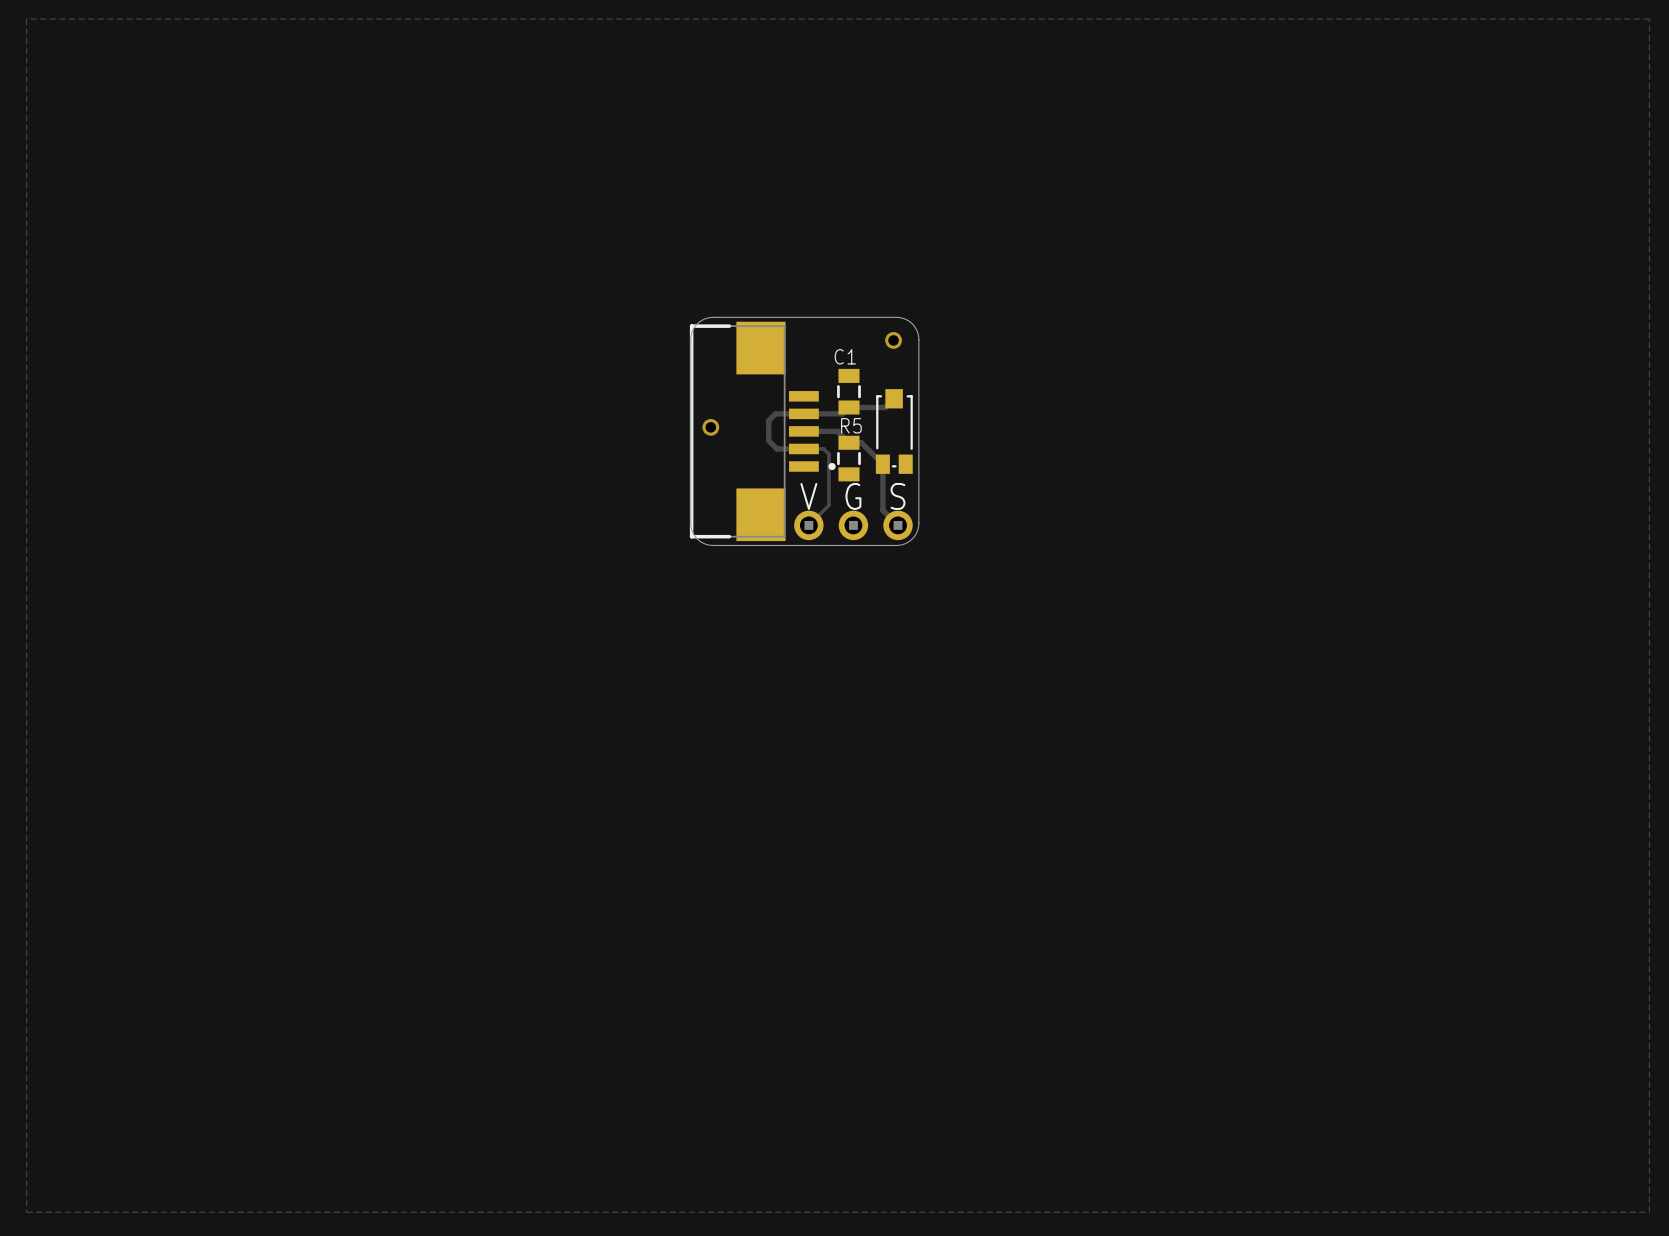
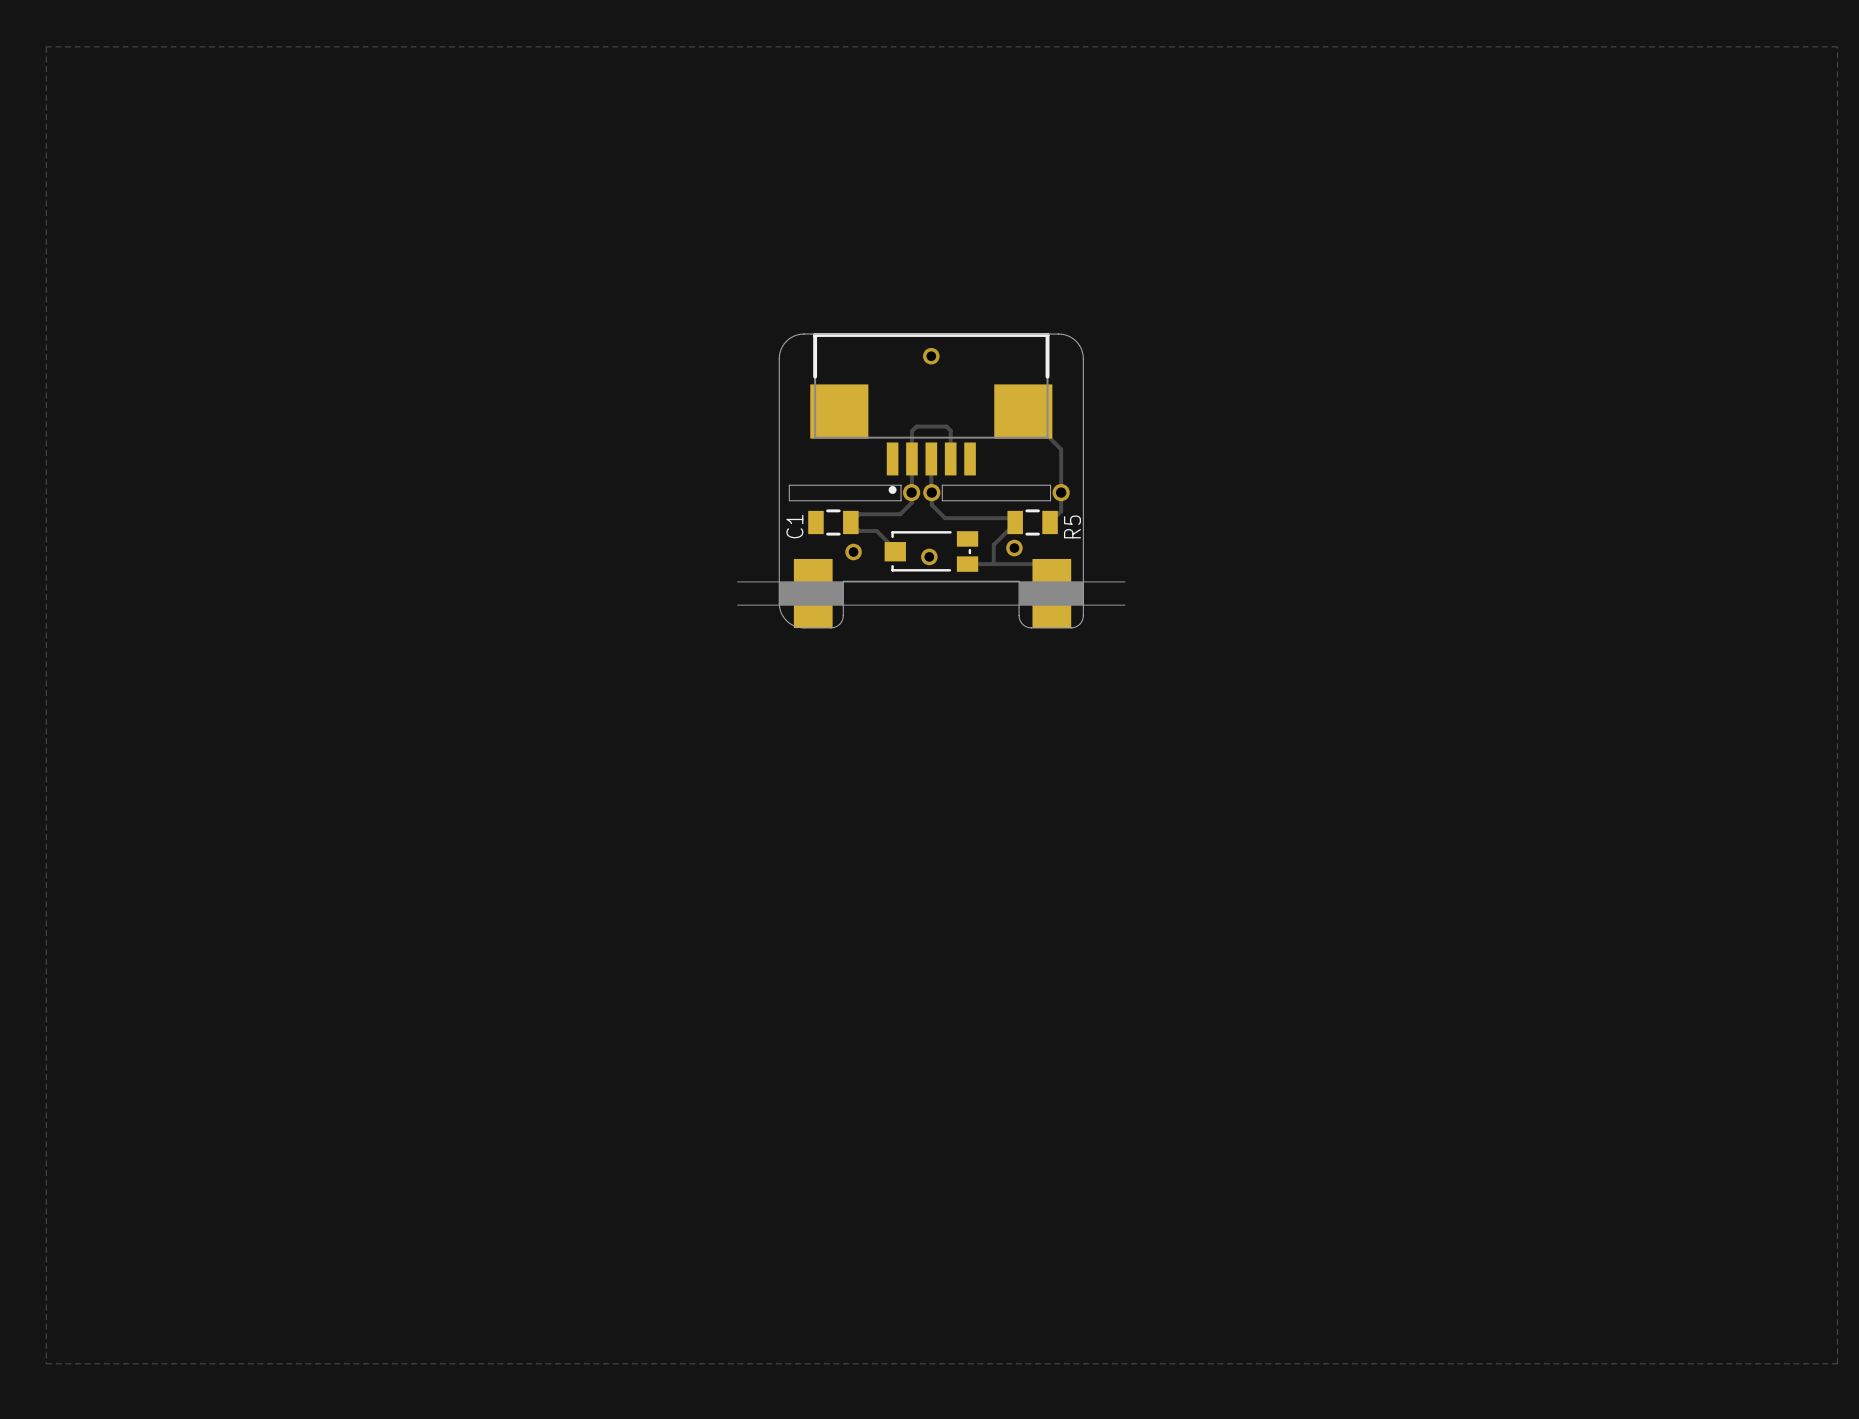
via: none -> (931, 356)
board edge: (690, 339) (692, 331) (697, 323) (704, 319) (713, 317) (899, 317) (910, 321) (918, 333) (918, 523) (914, 536) (907, 542) (896, 545) (737, 545) -> (779, 400) (780, 352) (788, 339) (800, 334) (1058, 334) (1073, 339) (1082, 352) (1083, 615) (1079, 624) (1071, 627) (1031, 627) (1023, 625) (1019, 617) (1019, 581) (843, 581) (842, 618) (838, 625) (830, 627)
via: (893, 340) -> none
track: none -> (1023, 411) (1061, 449) (1061, 511) (1050, 522)
C1 name position: C1 (845, 356) -> C1 (794, 526)
C1 rotation: 0° (848, 391) -> 90° clockwise (833, 522)
C1 position: (848, 391) -> (833, 522)
track: none -> (931, 458) (931, 504) (945, 518) (1010, 518) (1015, 522)
track: none -> (950, 458) (950, 430) (946, 426) (916, 426) (911, 431) (911, 502) (900, 514) (859, 514) (850, 522) (859, 530) (876, 530) (895, 551)
track: (894, 398) (885, 407) (848, 407) (842, 413) (775, 413) (768, 420) (768, 440) (776, 448) (823, 448) (828, 454) (828, 505) (808, 525) -> none
board edge: none -> (789, 485) (789, 500) (901, 500) (901, 485) (789, 485)
board edge: none -> (942, 485) (1050, 485) (1050, 500) (942, 500) (942, 485)
via: none -> (911, 492)
via: none -> (931, 492)
via: none -> (1061, 492)
via: (710, 427) -> none
part rotation: 0° (762, 431) -> 90° clockwise (931, 413)
track: (803, 431) (837, 431) (848, 442) (861, 442) (882, 464) (882, 510) (898, 525) -> none
part rotation: 0° (894, 431) -> 90° counterclockwise (931, 551)
part position: (894, 431) -> (931, 551)
track: none -> (1015, 522) (993, 544) (993, 564)
R5 rotation: 0° (848, 458) -> 90° clockwise (1032, 522)
R5 position: (848, 458) -> (1032, 522)
via: none -> (1014, 548)
via: none -> (853, 552)
via: none -> (929, 556)
track: none -> (967, 564) (1051, 564) (1051, 571)
text: V (808, 496) -> none
text: G (853, 496) -> none
text: S (898, 496) -> none
part: none -> (931, 593)
part: (853, 525) -> none

